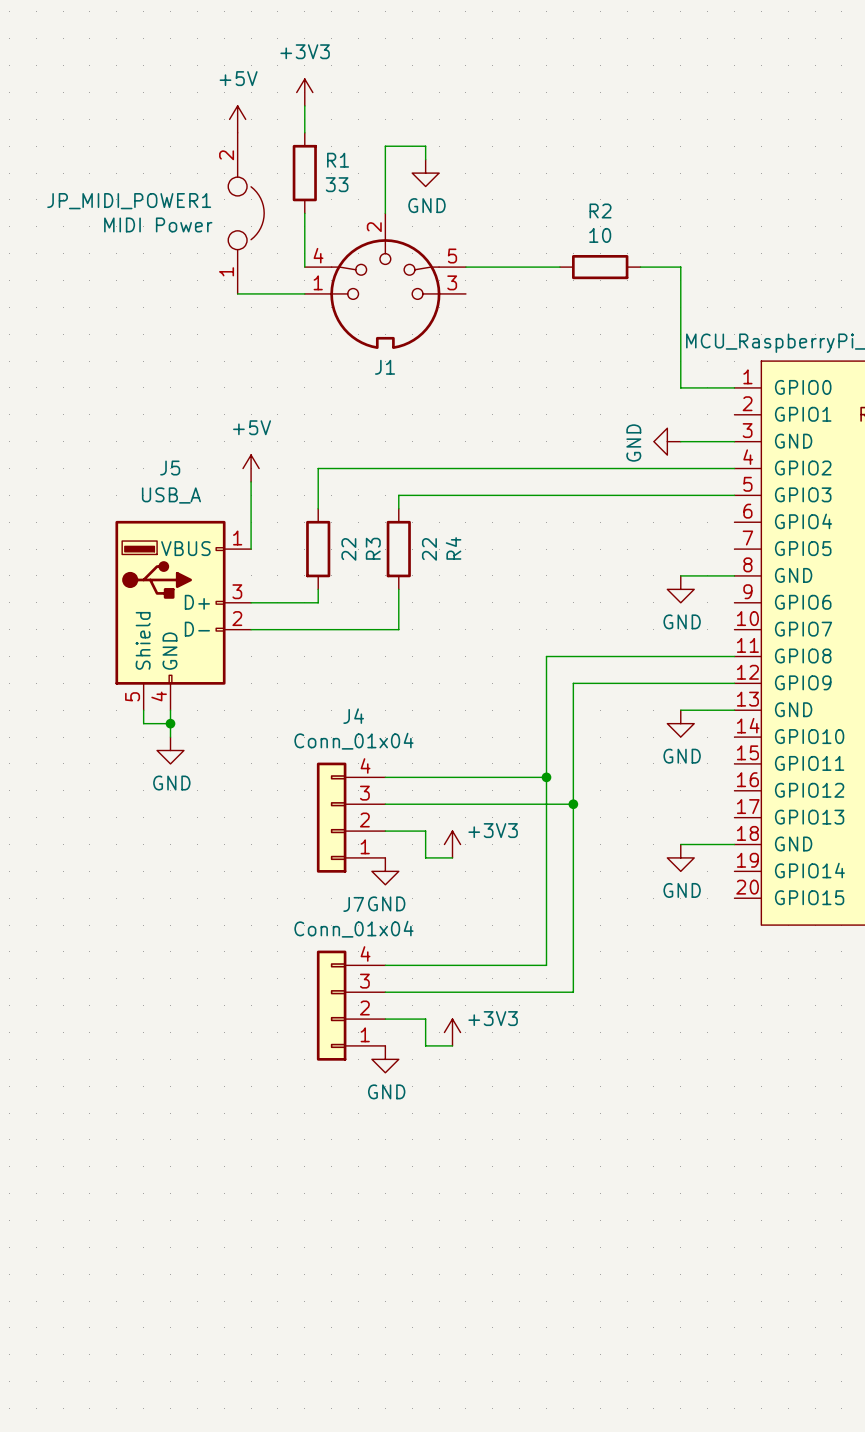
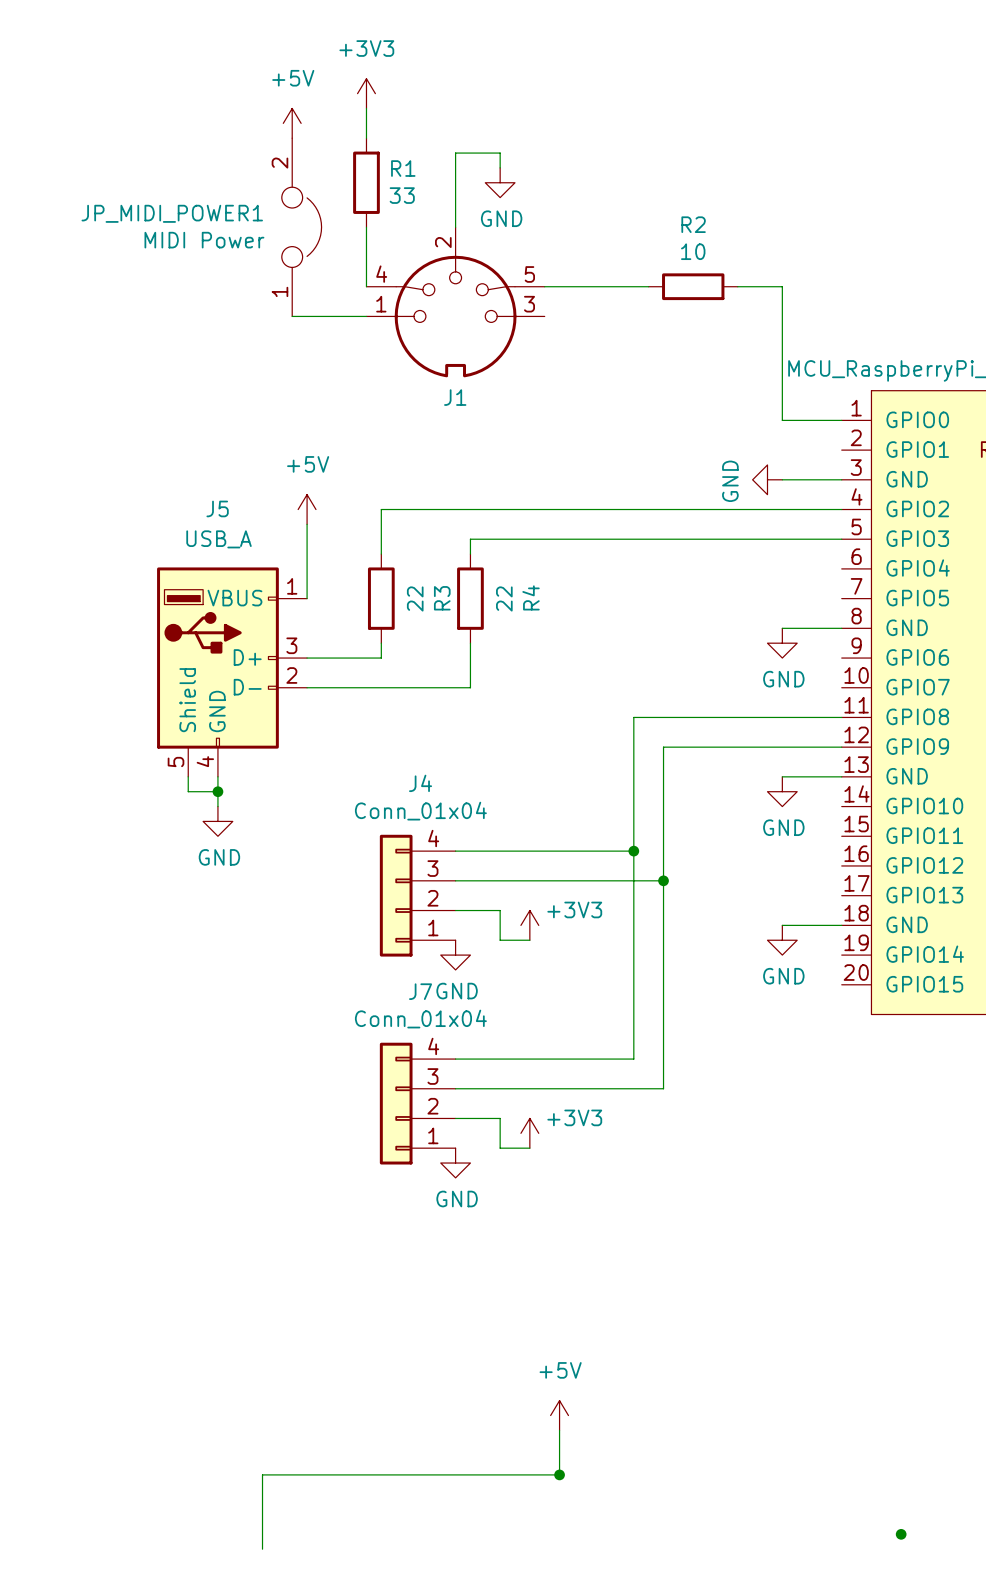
power symbol: none -> +5V (559, 1415)
wire: none -> (559, 1430) (559, 1474) (262, 1474) (262, 1549)
junction: none -> (559, 1474)
junction: none -> (901, 1534)

